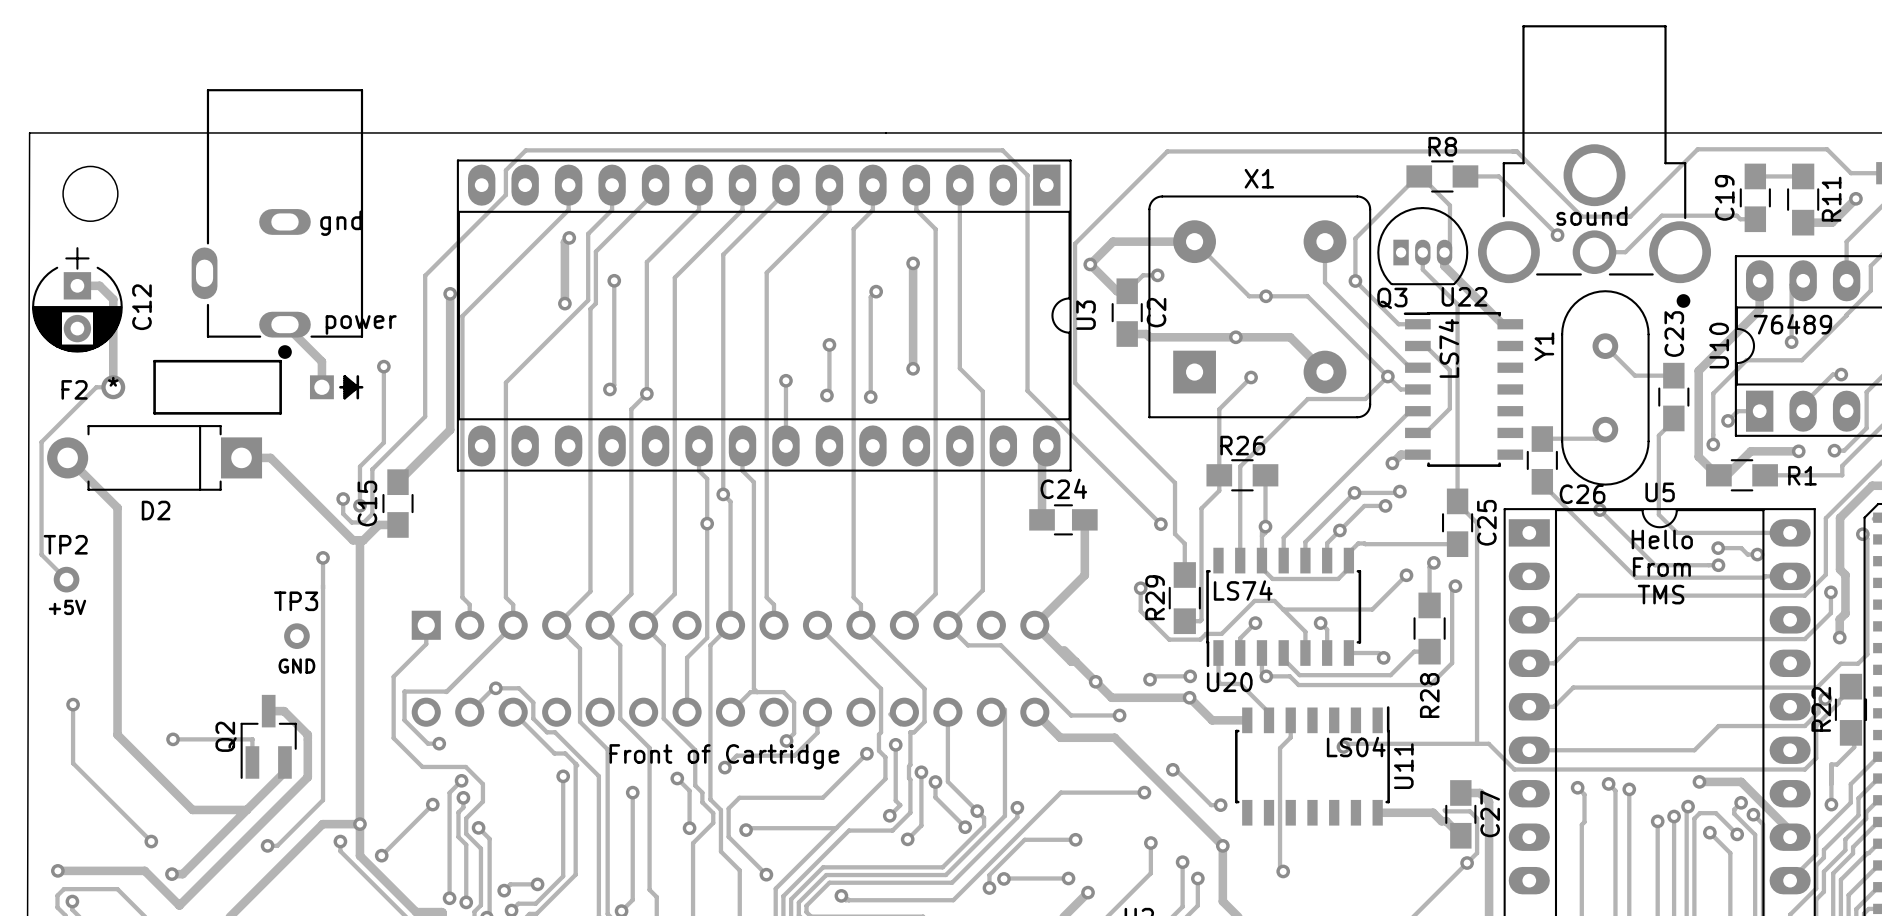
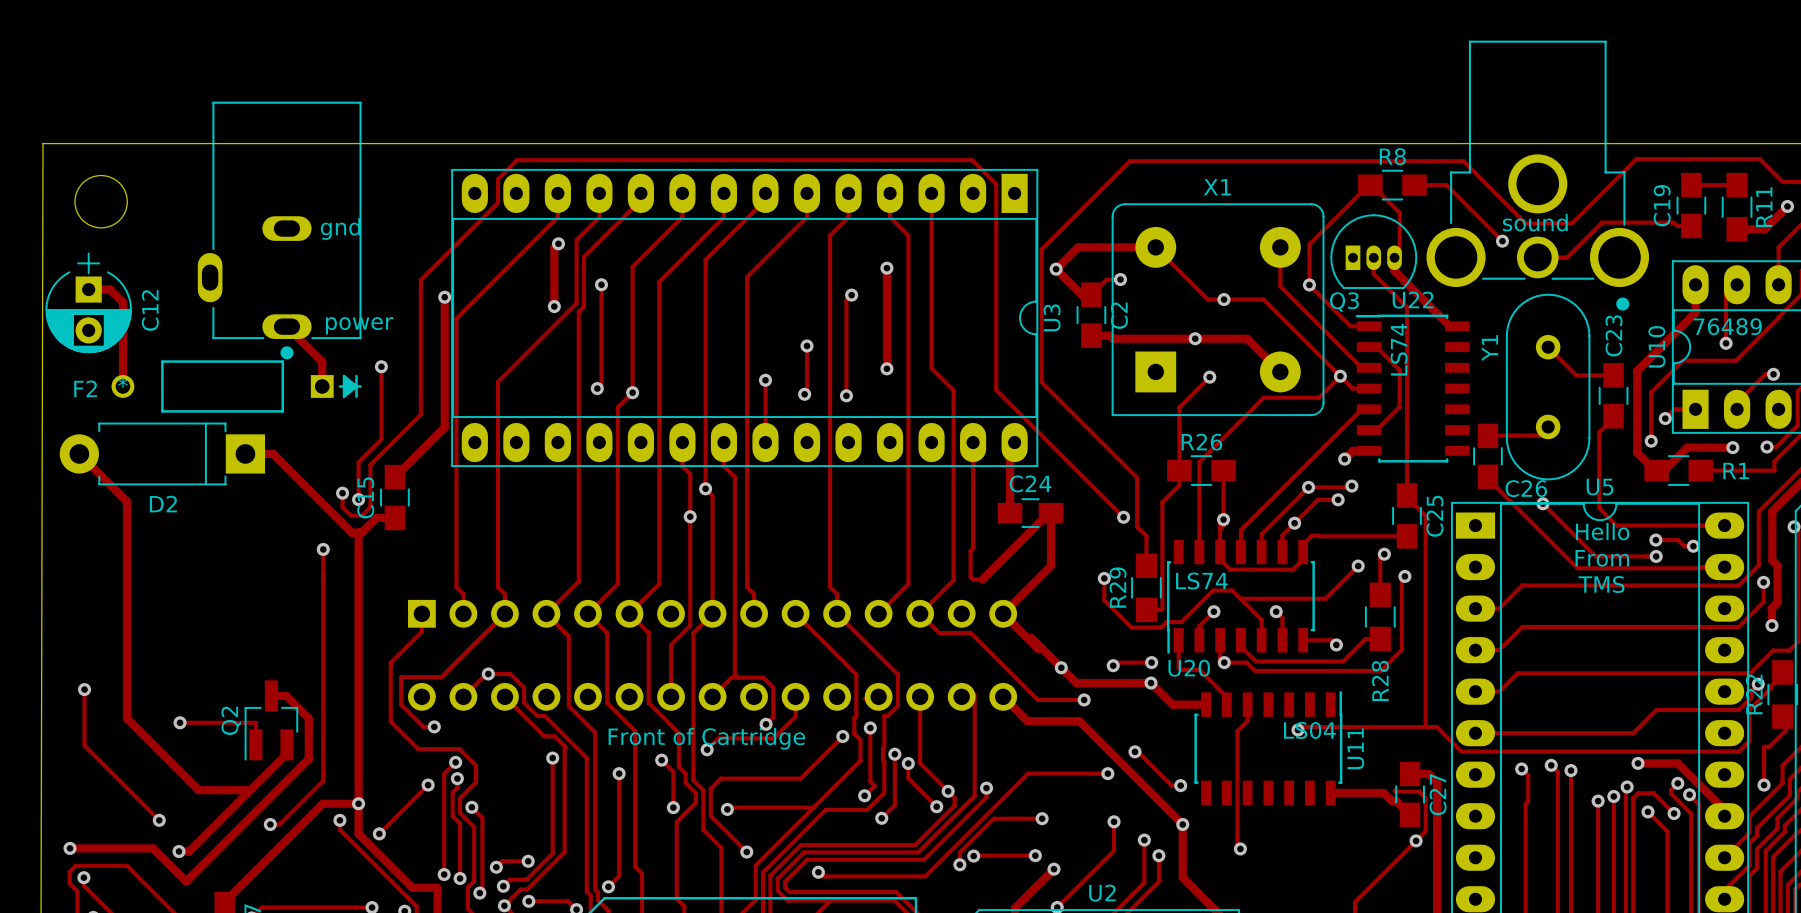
track: (113, 387) (96, 387) (41, 442) (41, 554) (66, 579) -> none
track: none -> (973, 442) (973, 548) (970, 551) (970, 577) (973, 579) (982, 579) (1048, 513)
TP2: (66, 579) -> none
text: +5V (67, 607) -> none
TP3: (296, 636) -> none
text: GND (296, 666) -> none

